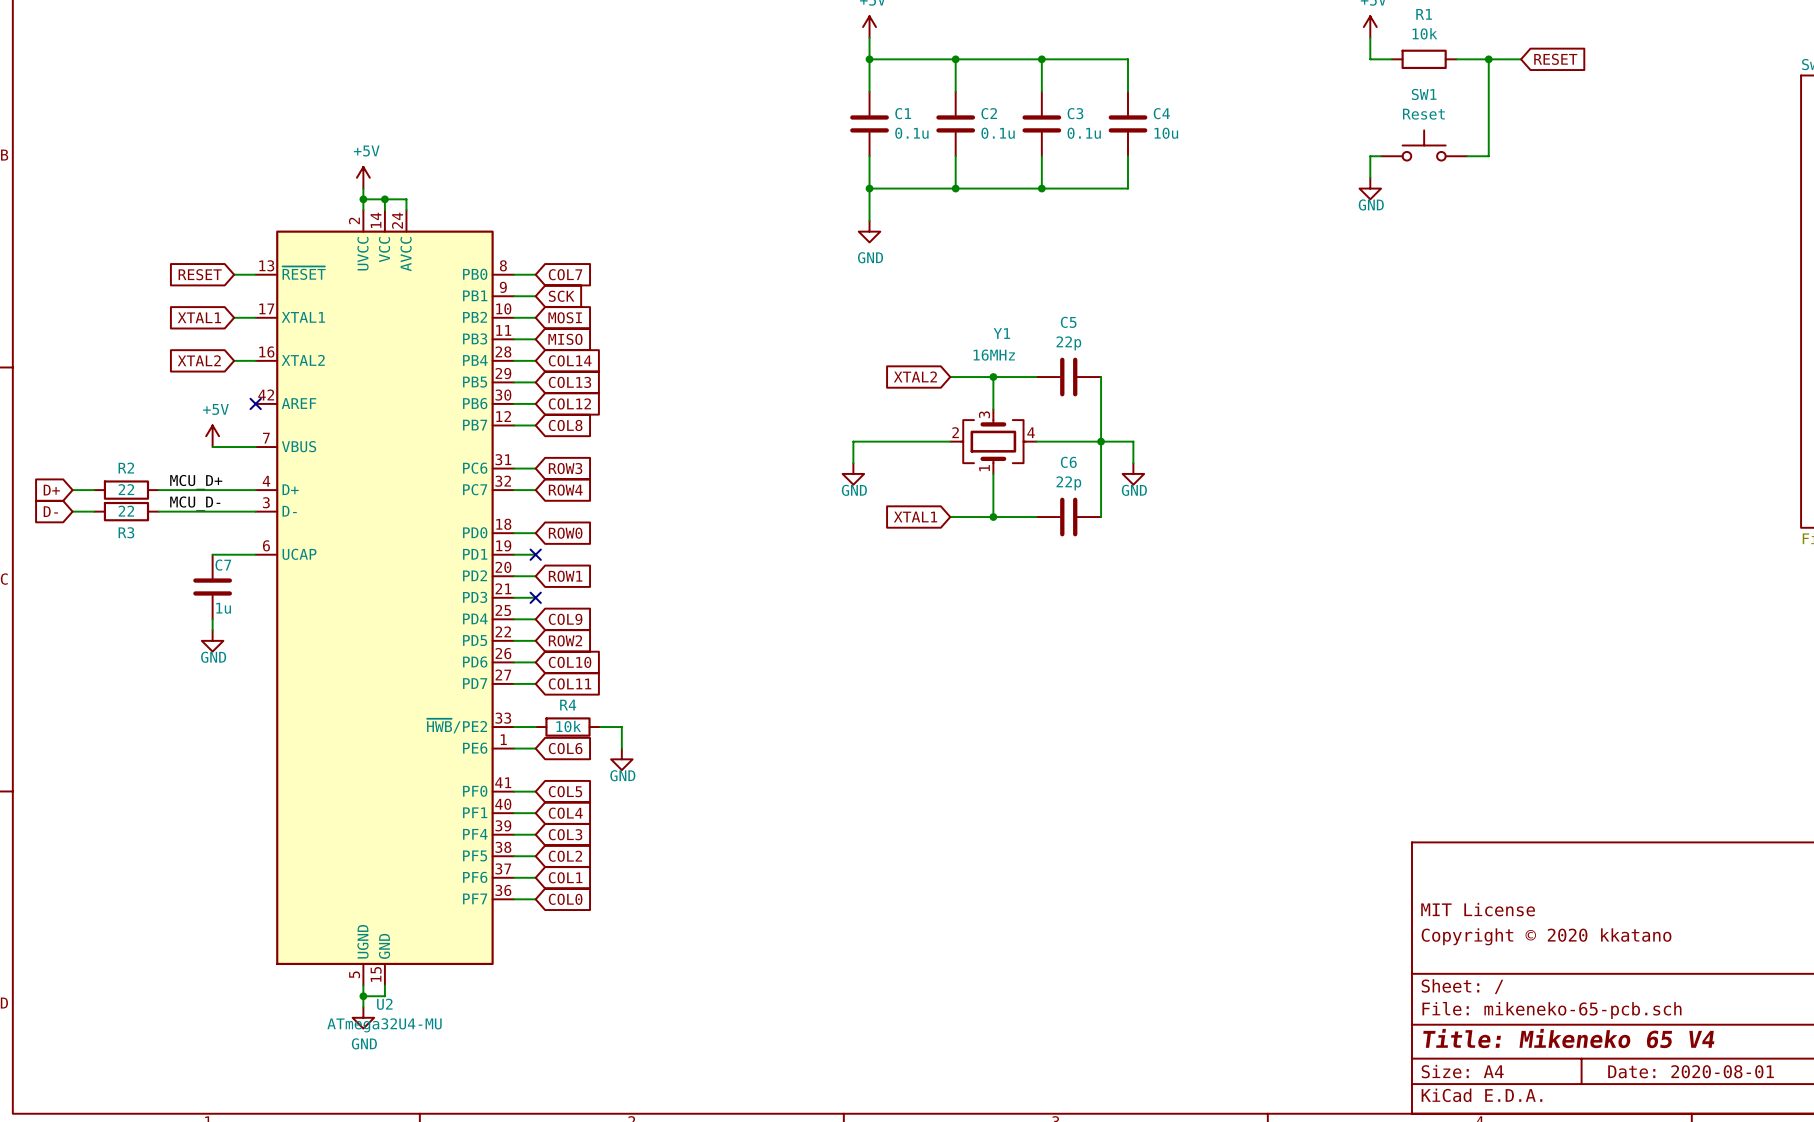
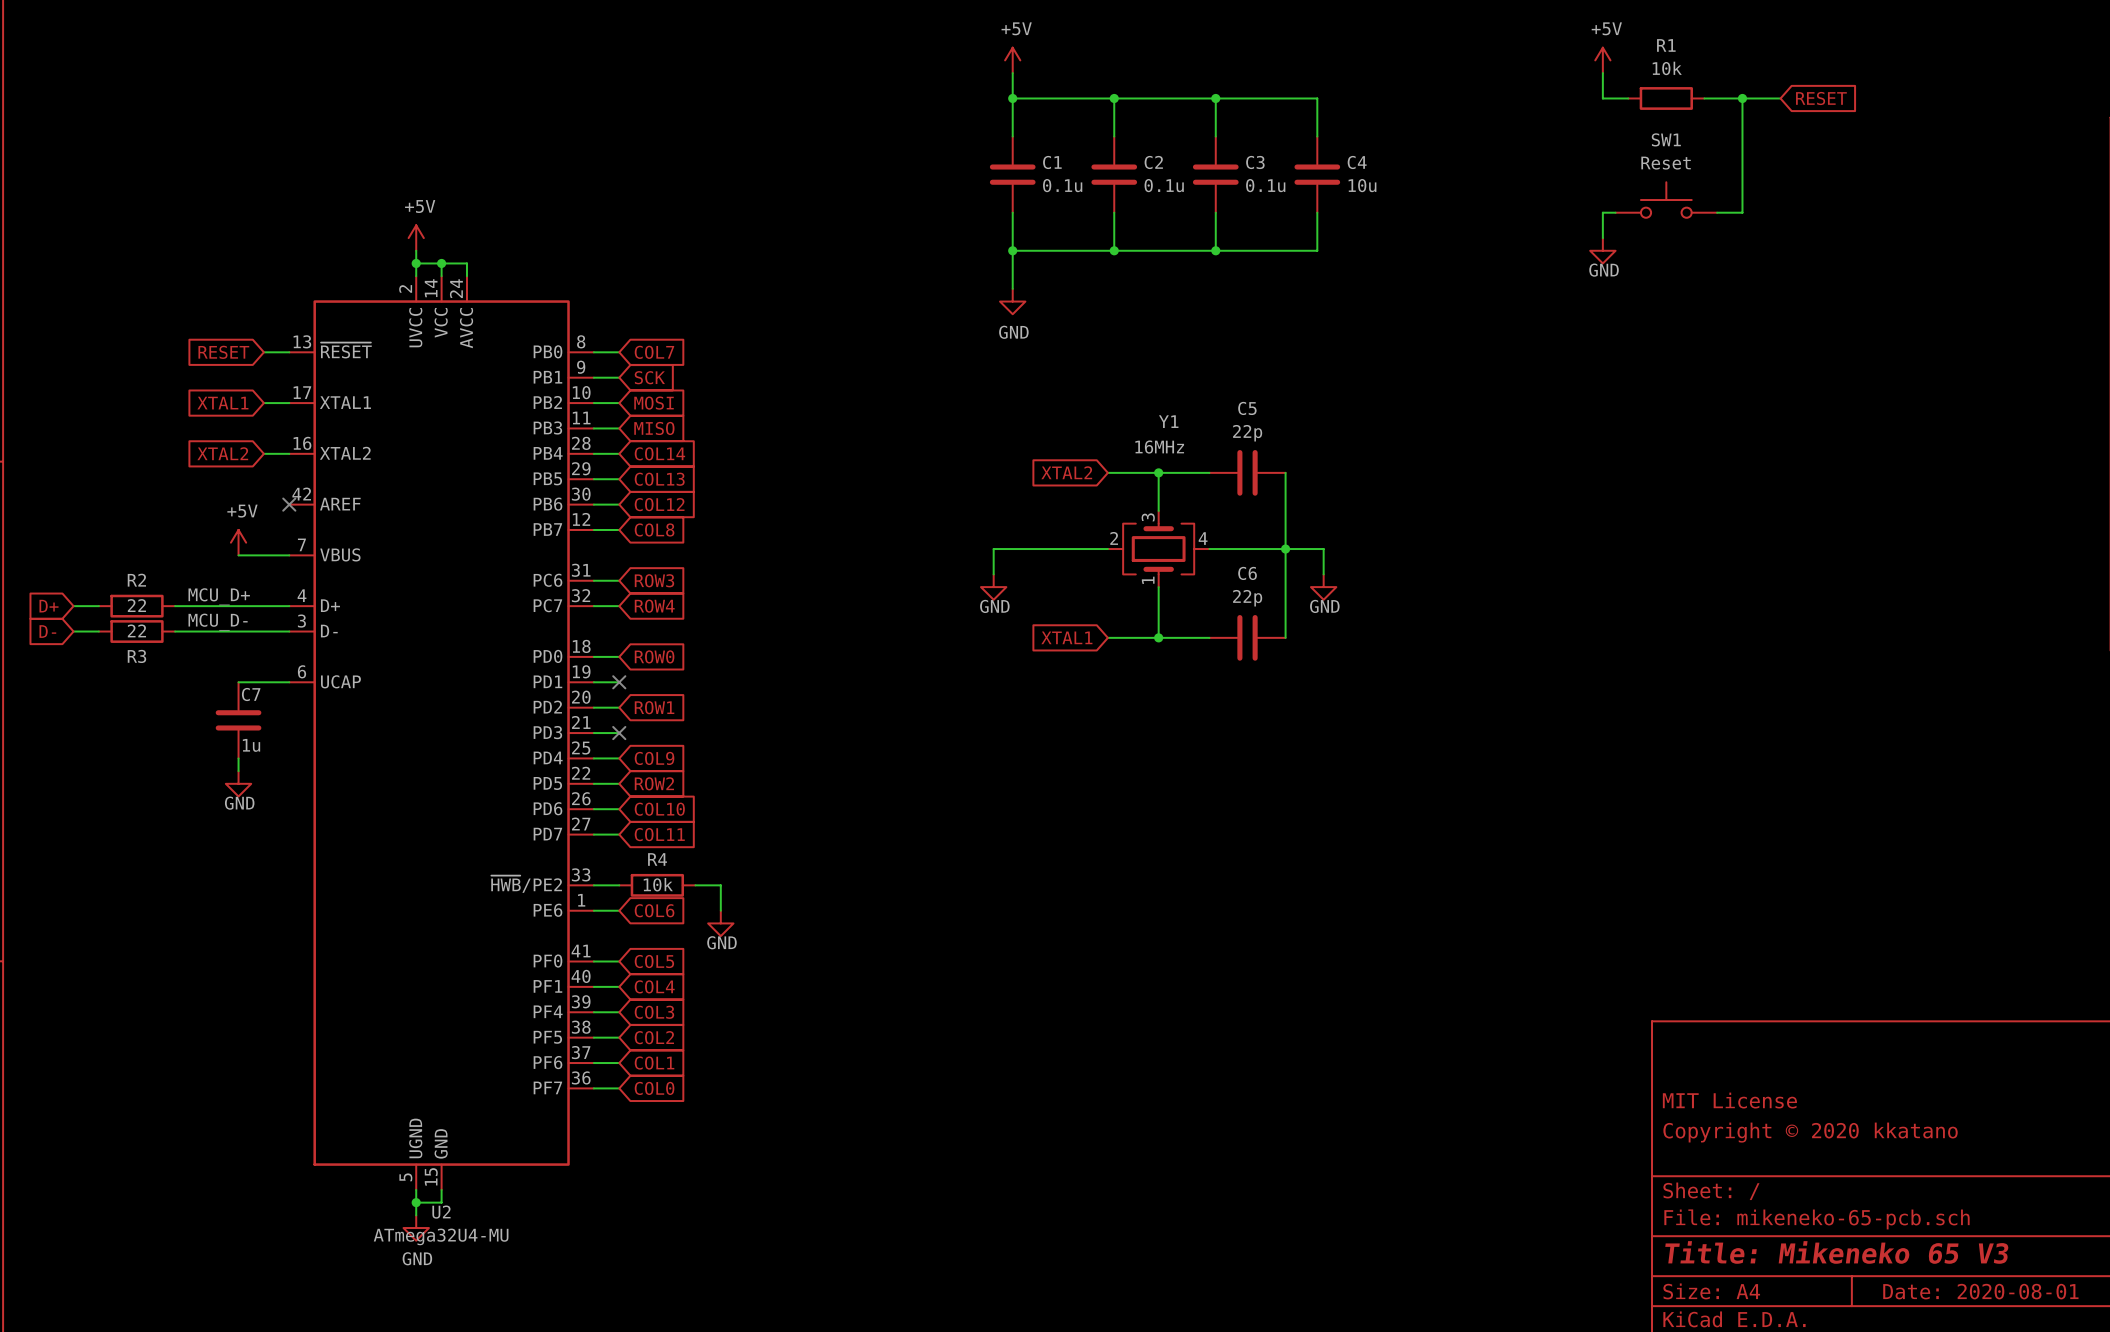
title block: Title: Mikeneko 65 V4 (1568, 1038) -> Title: Mikeneko 65 V3 (1836, 1252)

